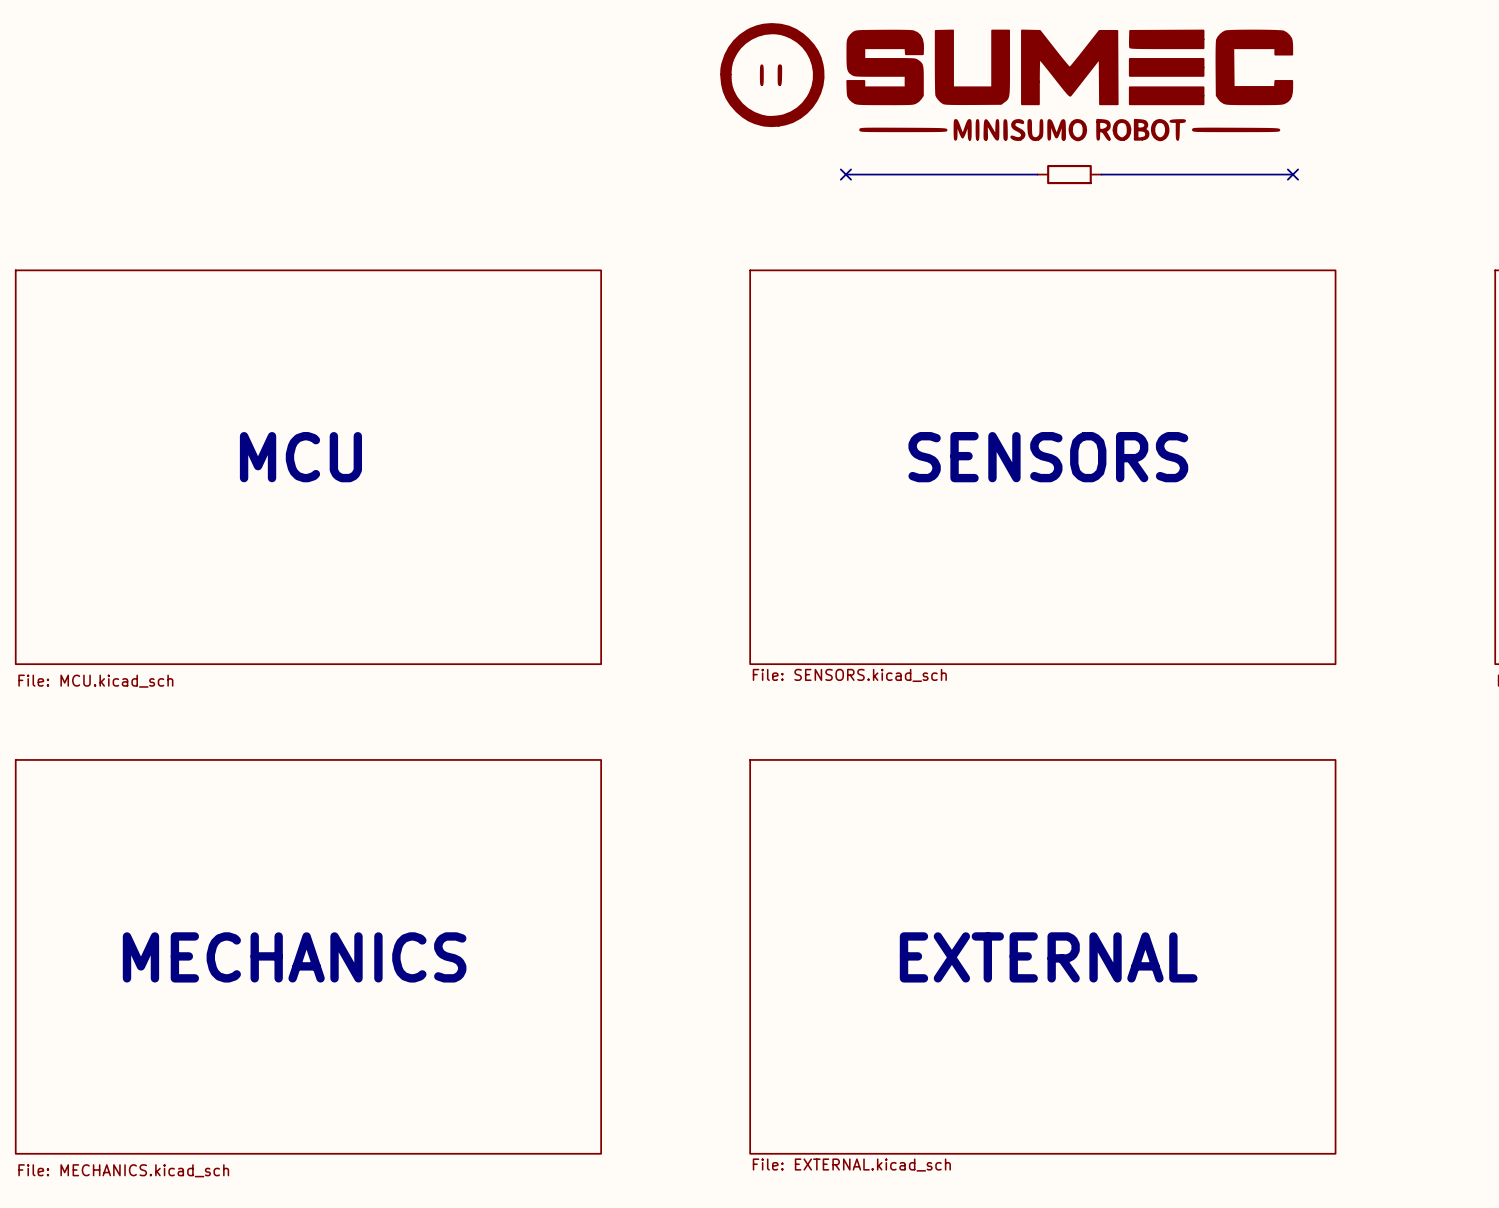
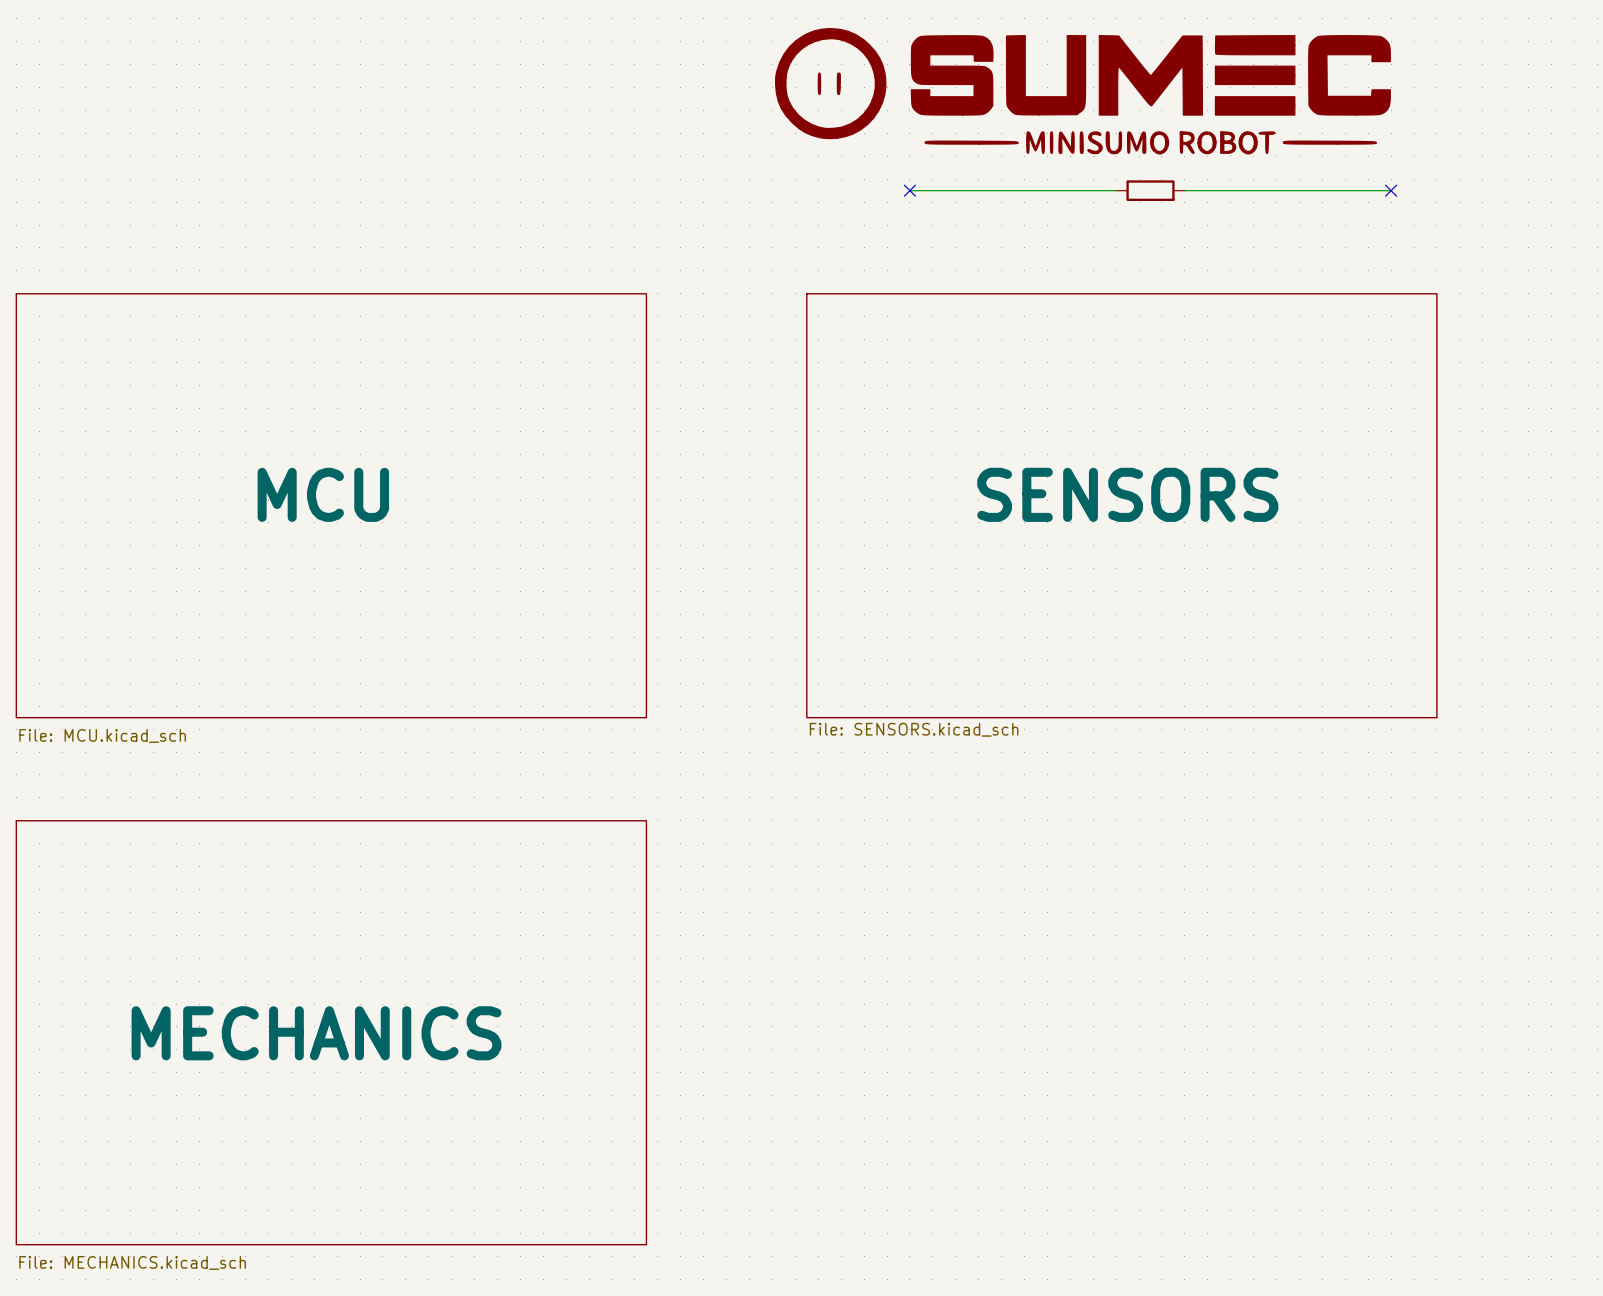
sheet EXTERNAL: File: EXTERNAL.kicad_sch (1042, 956) -> none

